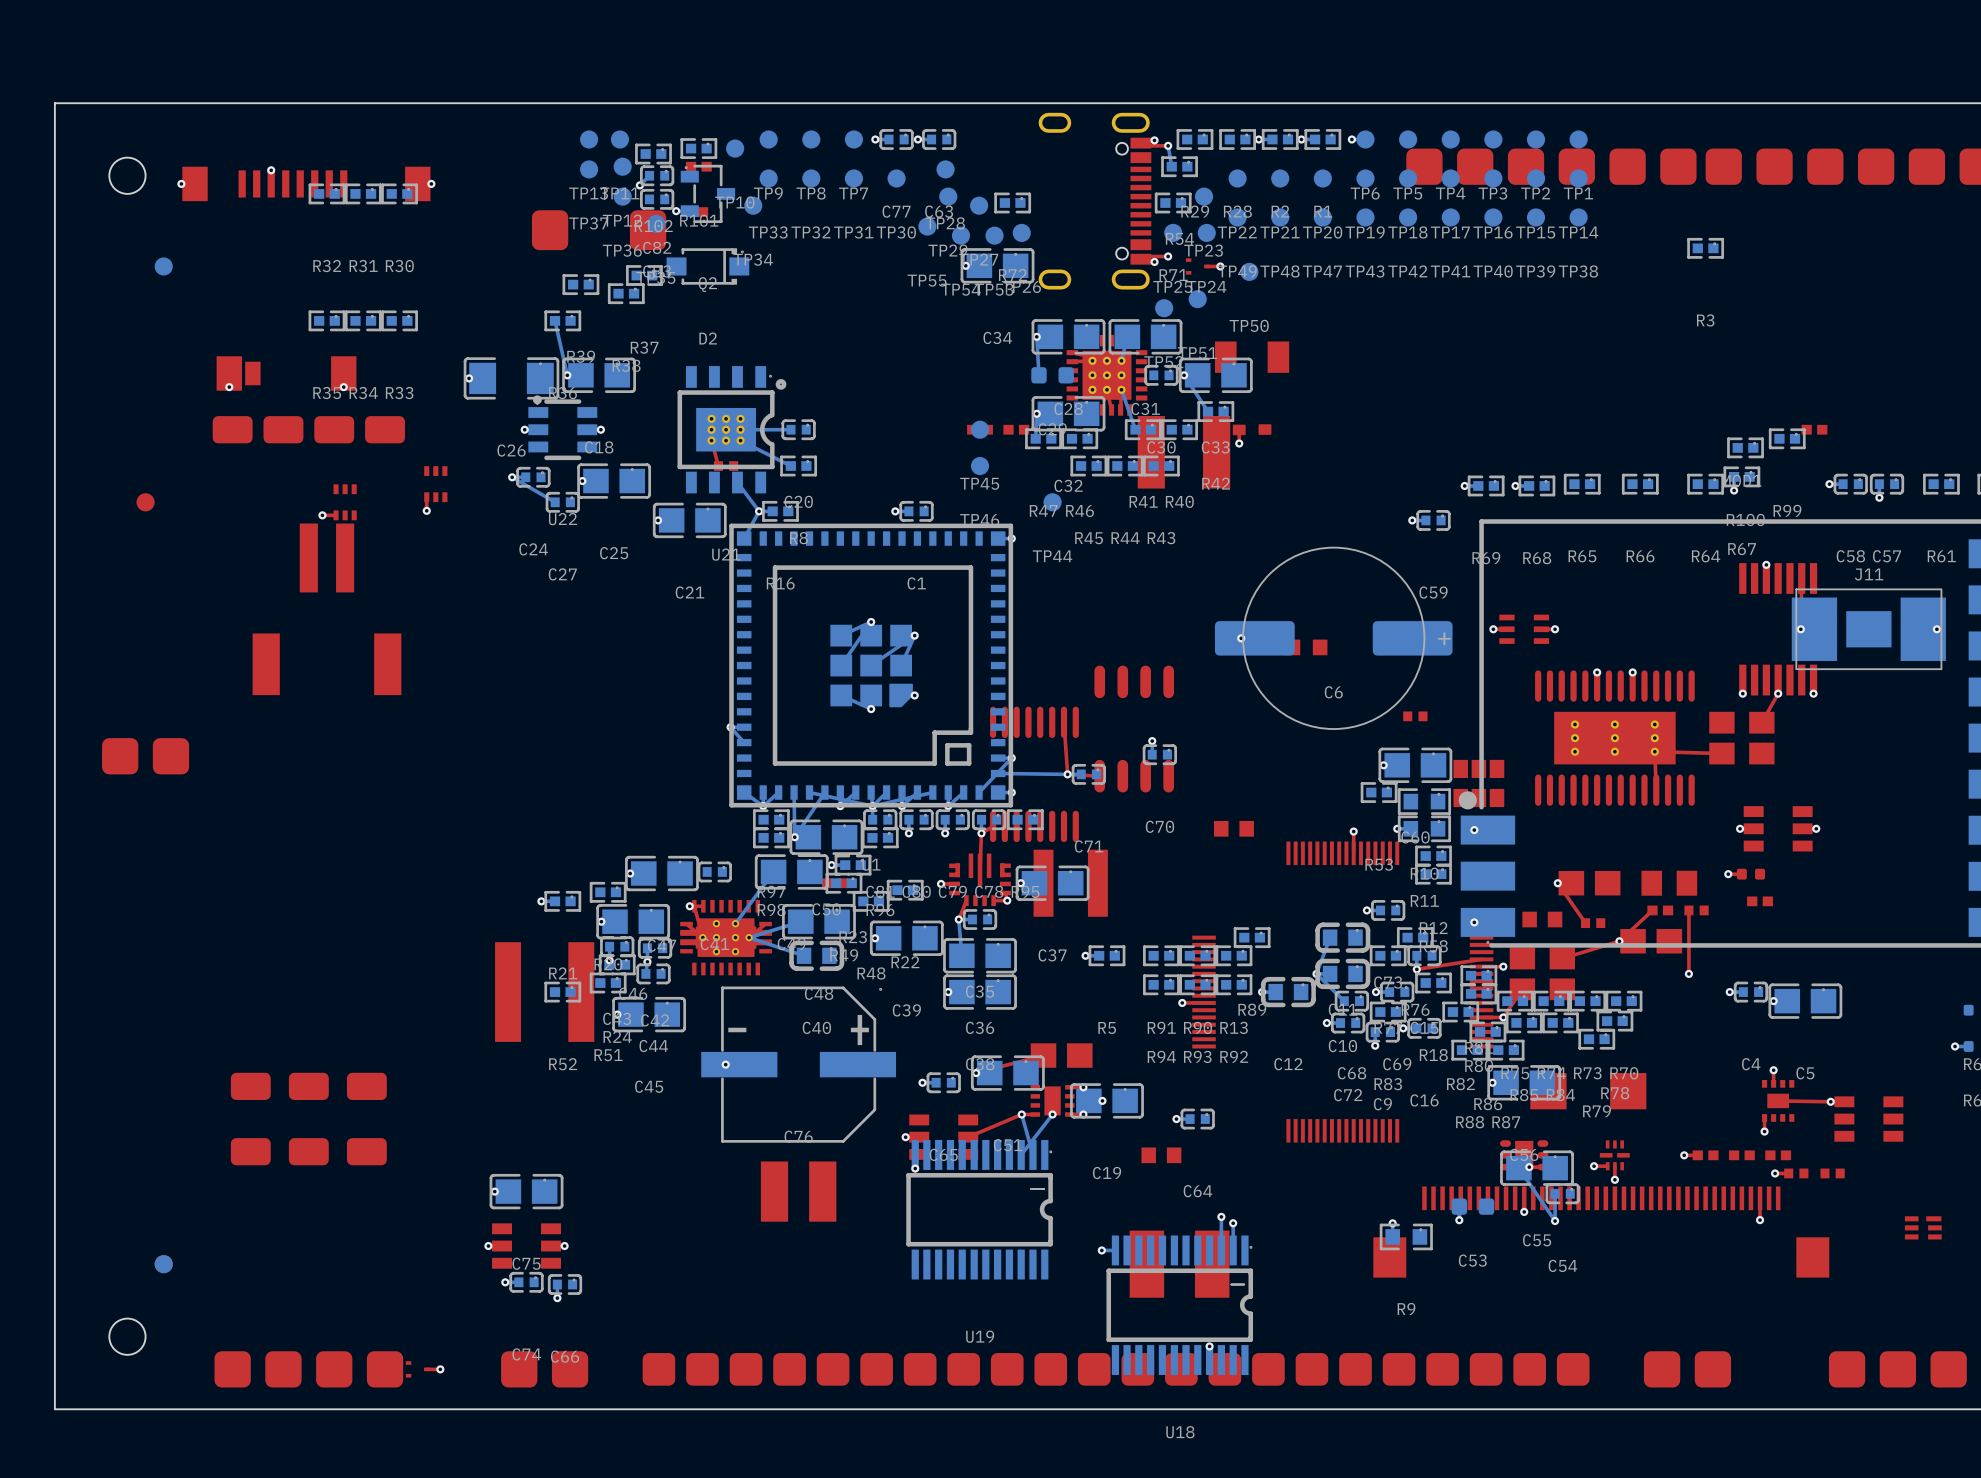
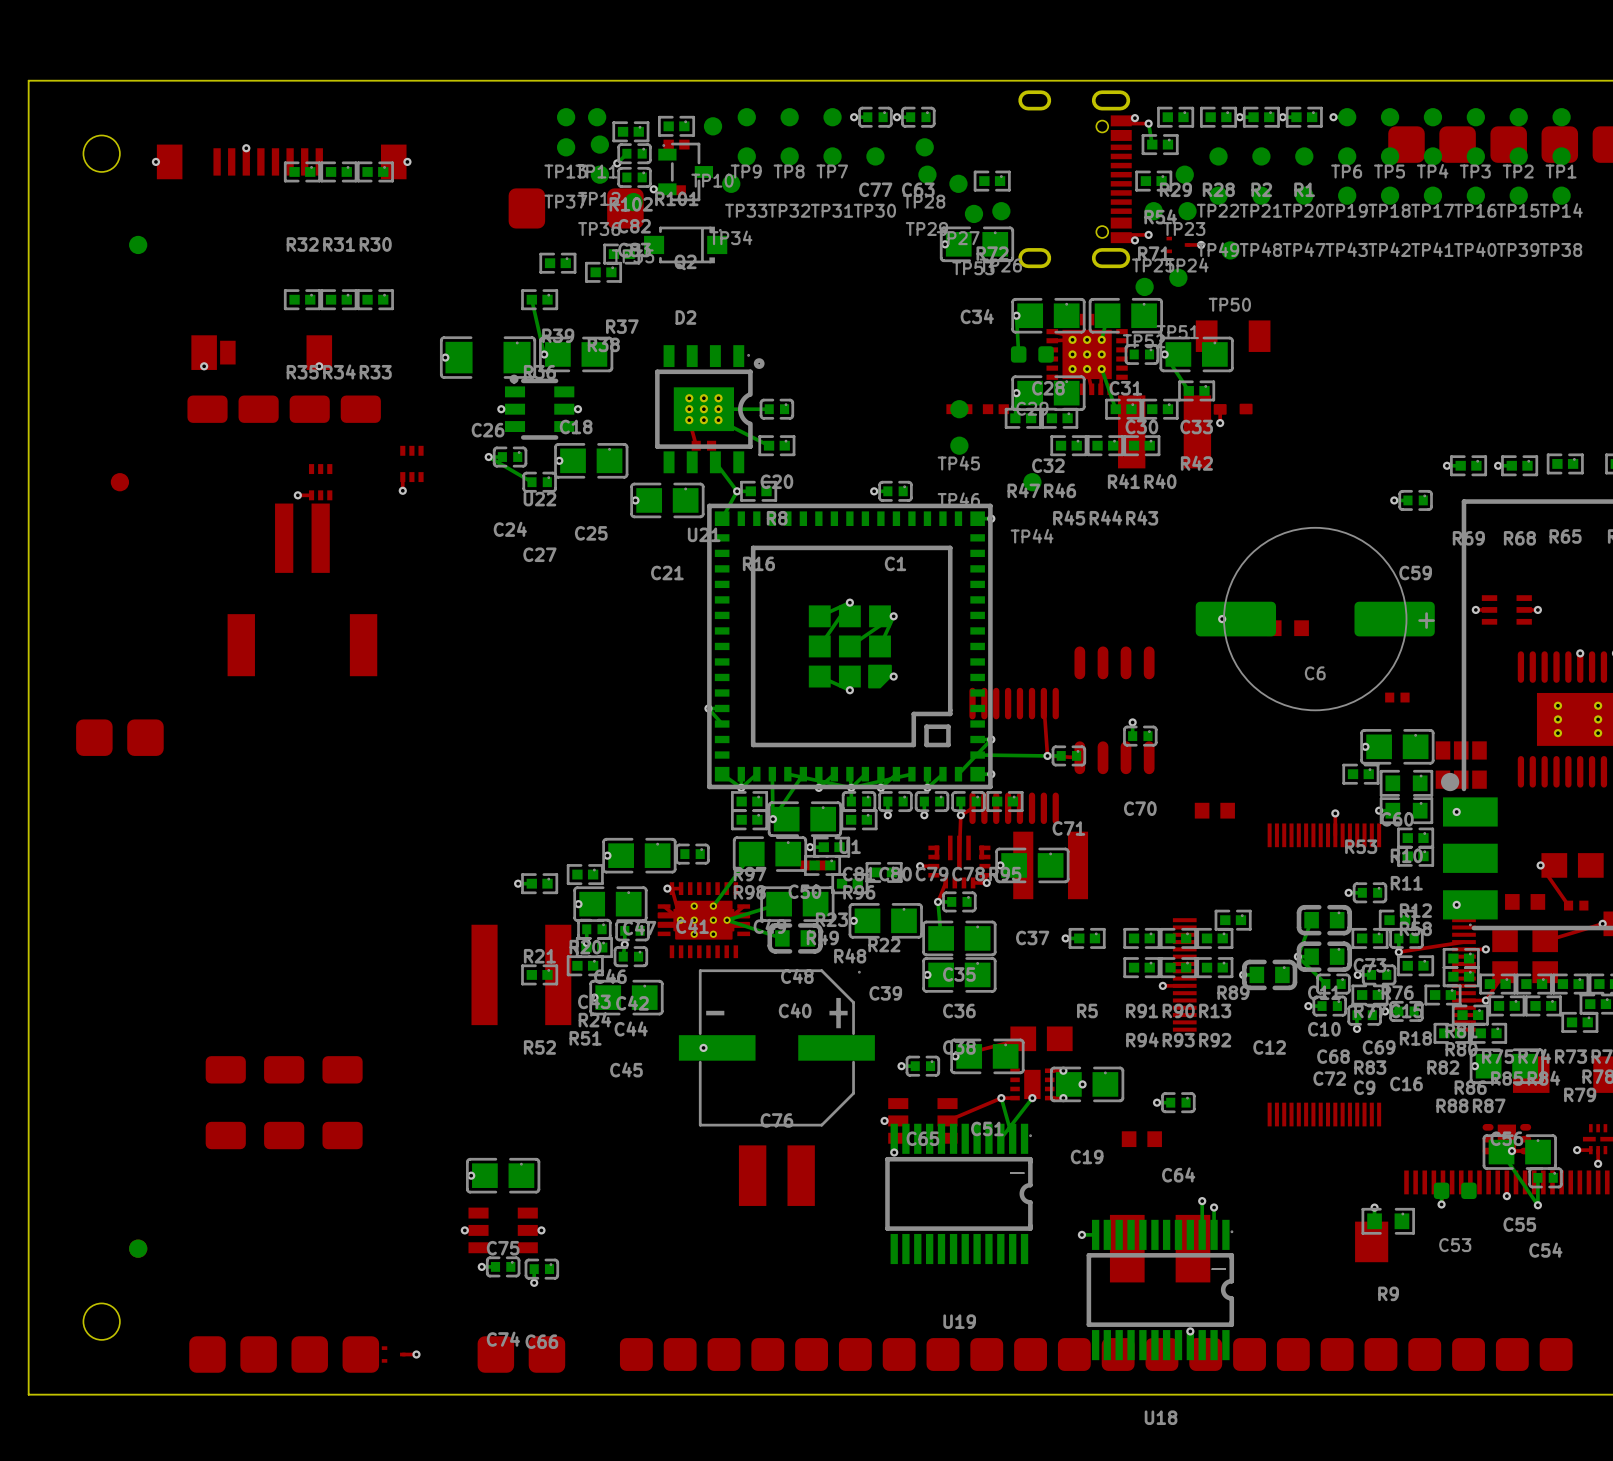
TP55: (927, 226) -> none
TP54: (960, 235) -> none

